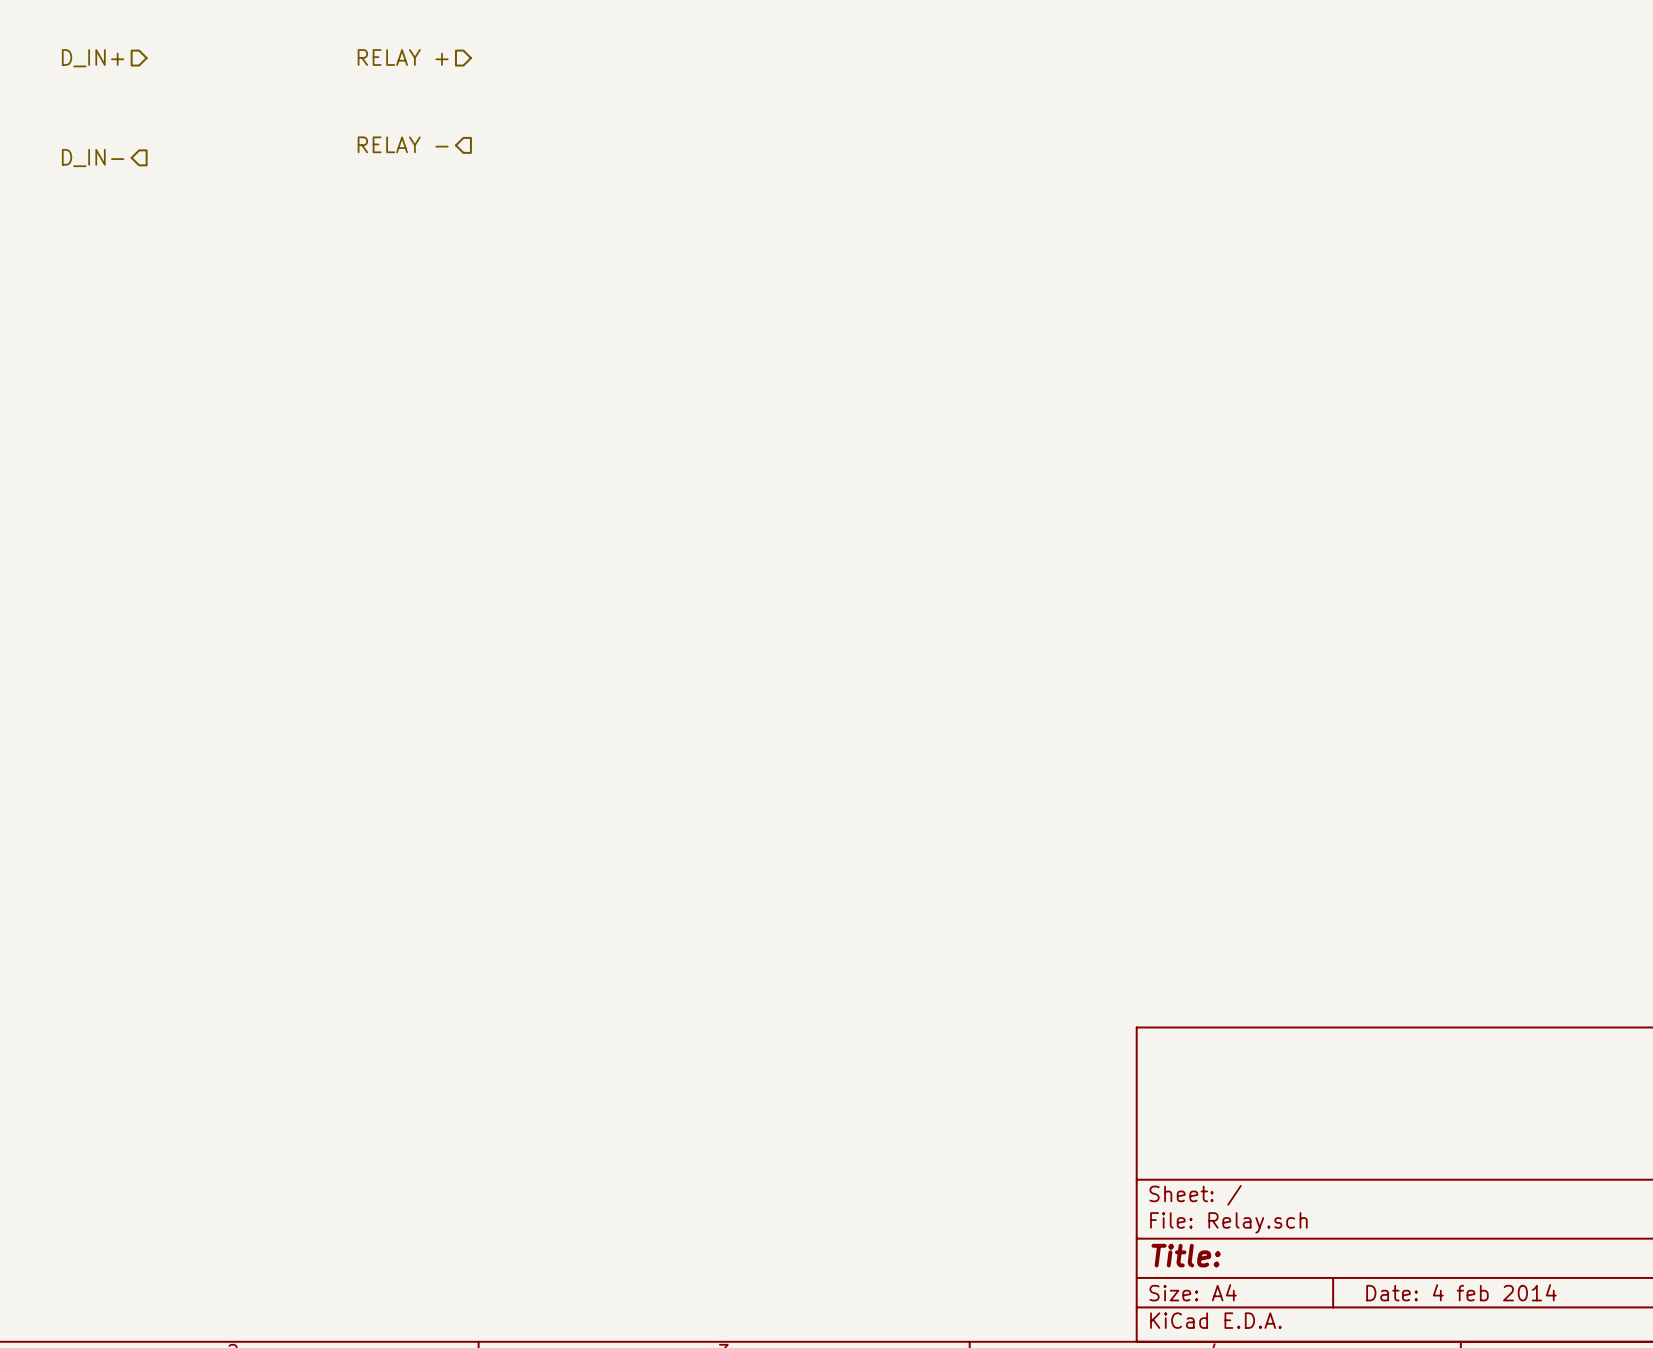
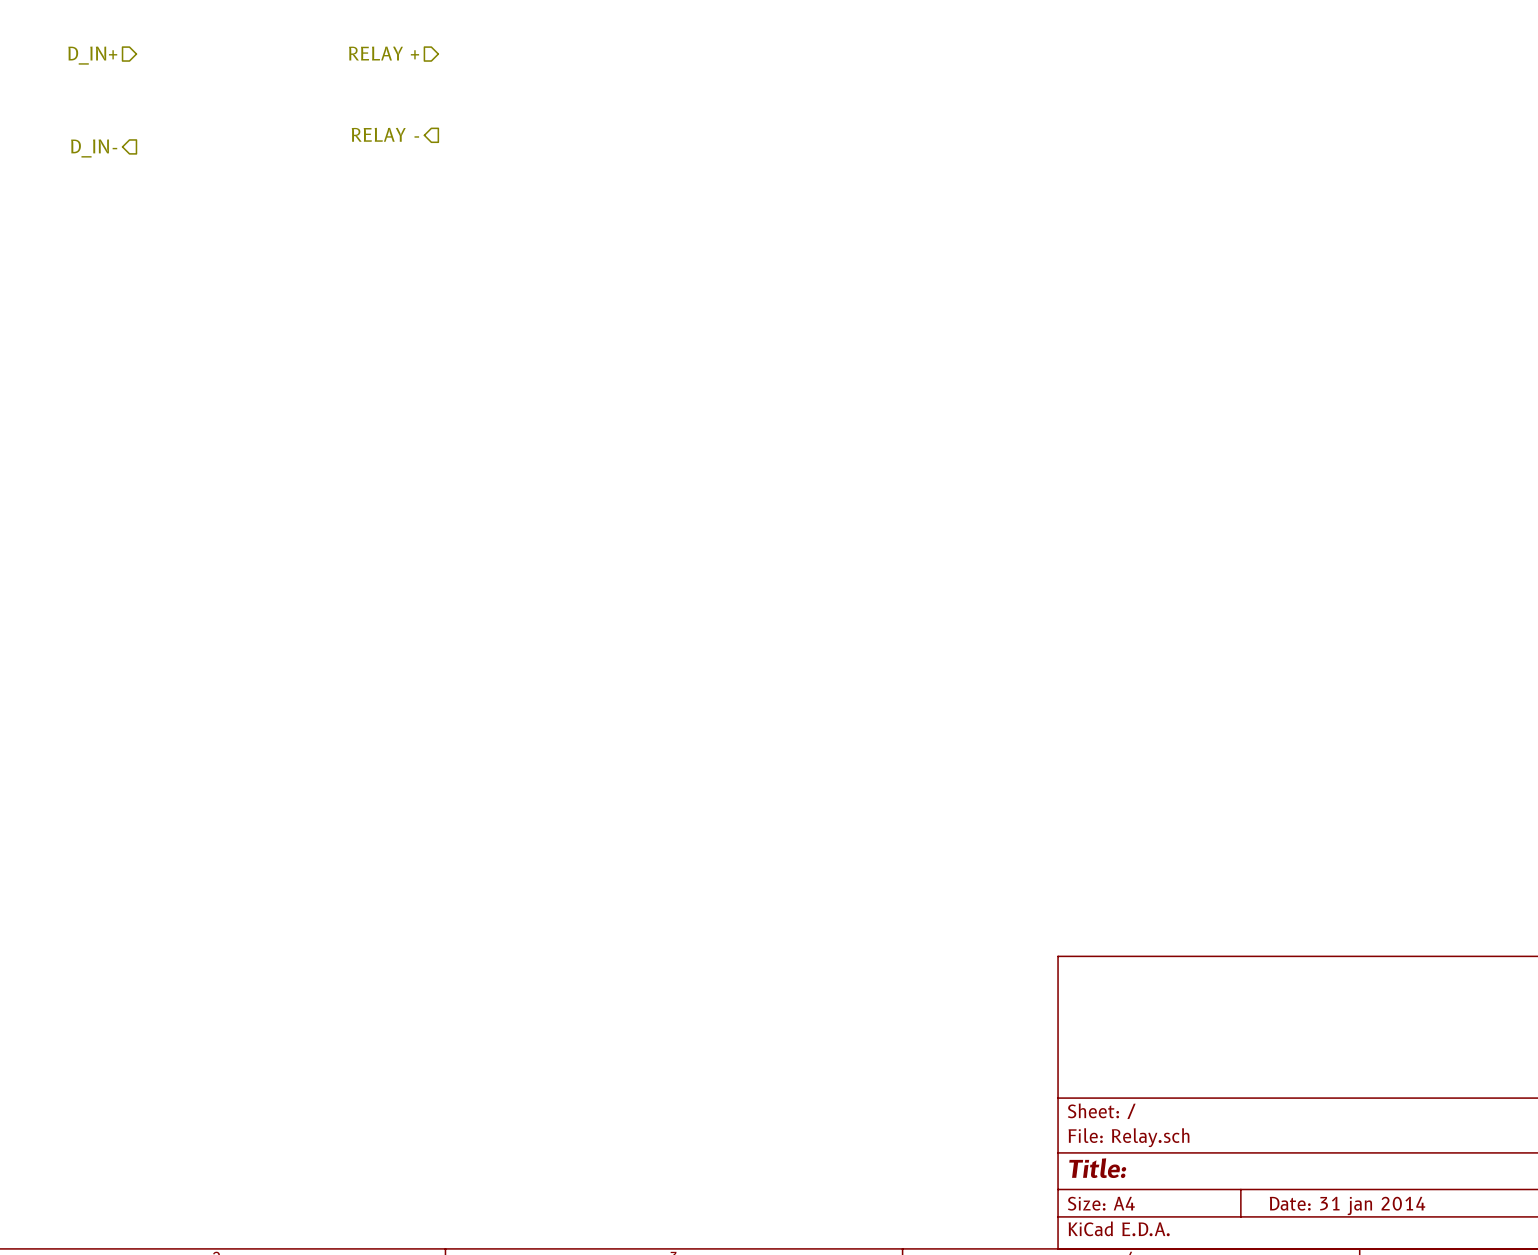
title block: Date: 4 feb 2014 (1461, 1292) -> Date: 31 jan 2014 (1347, 1205)

